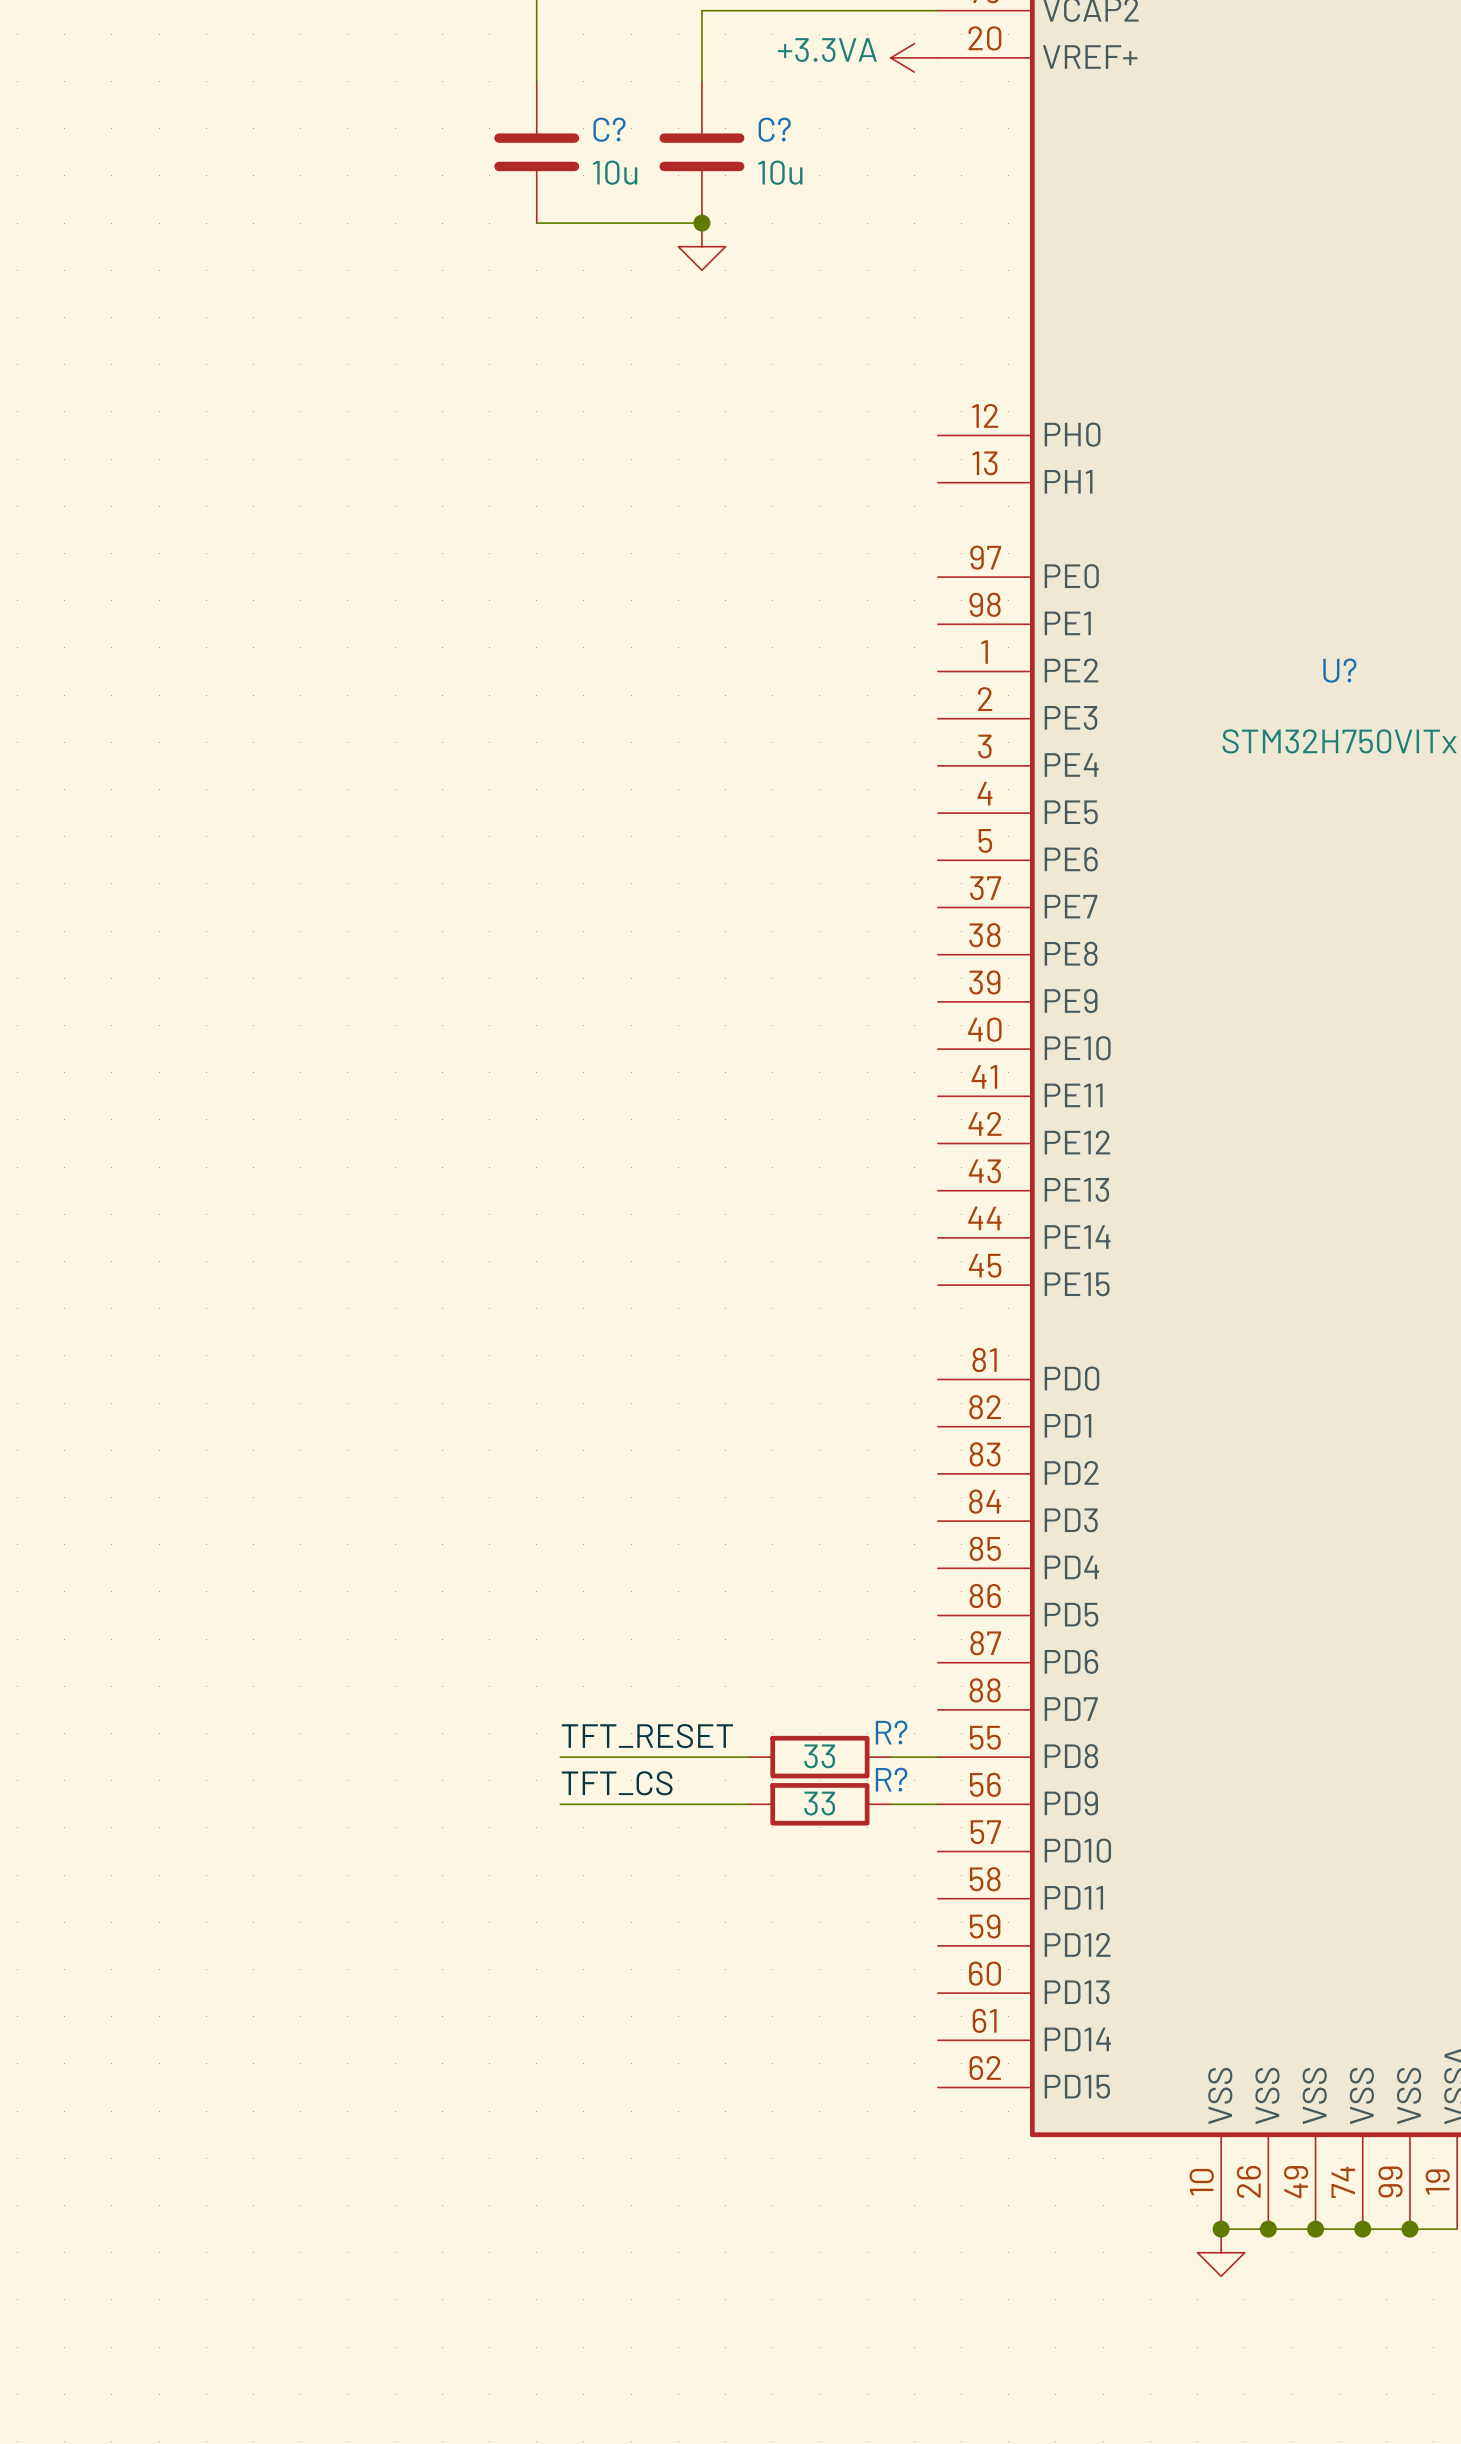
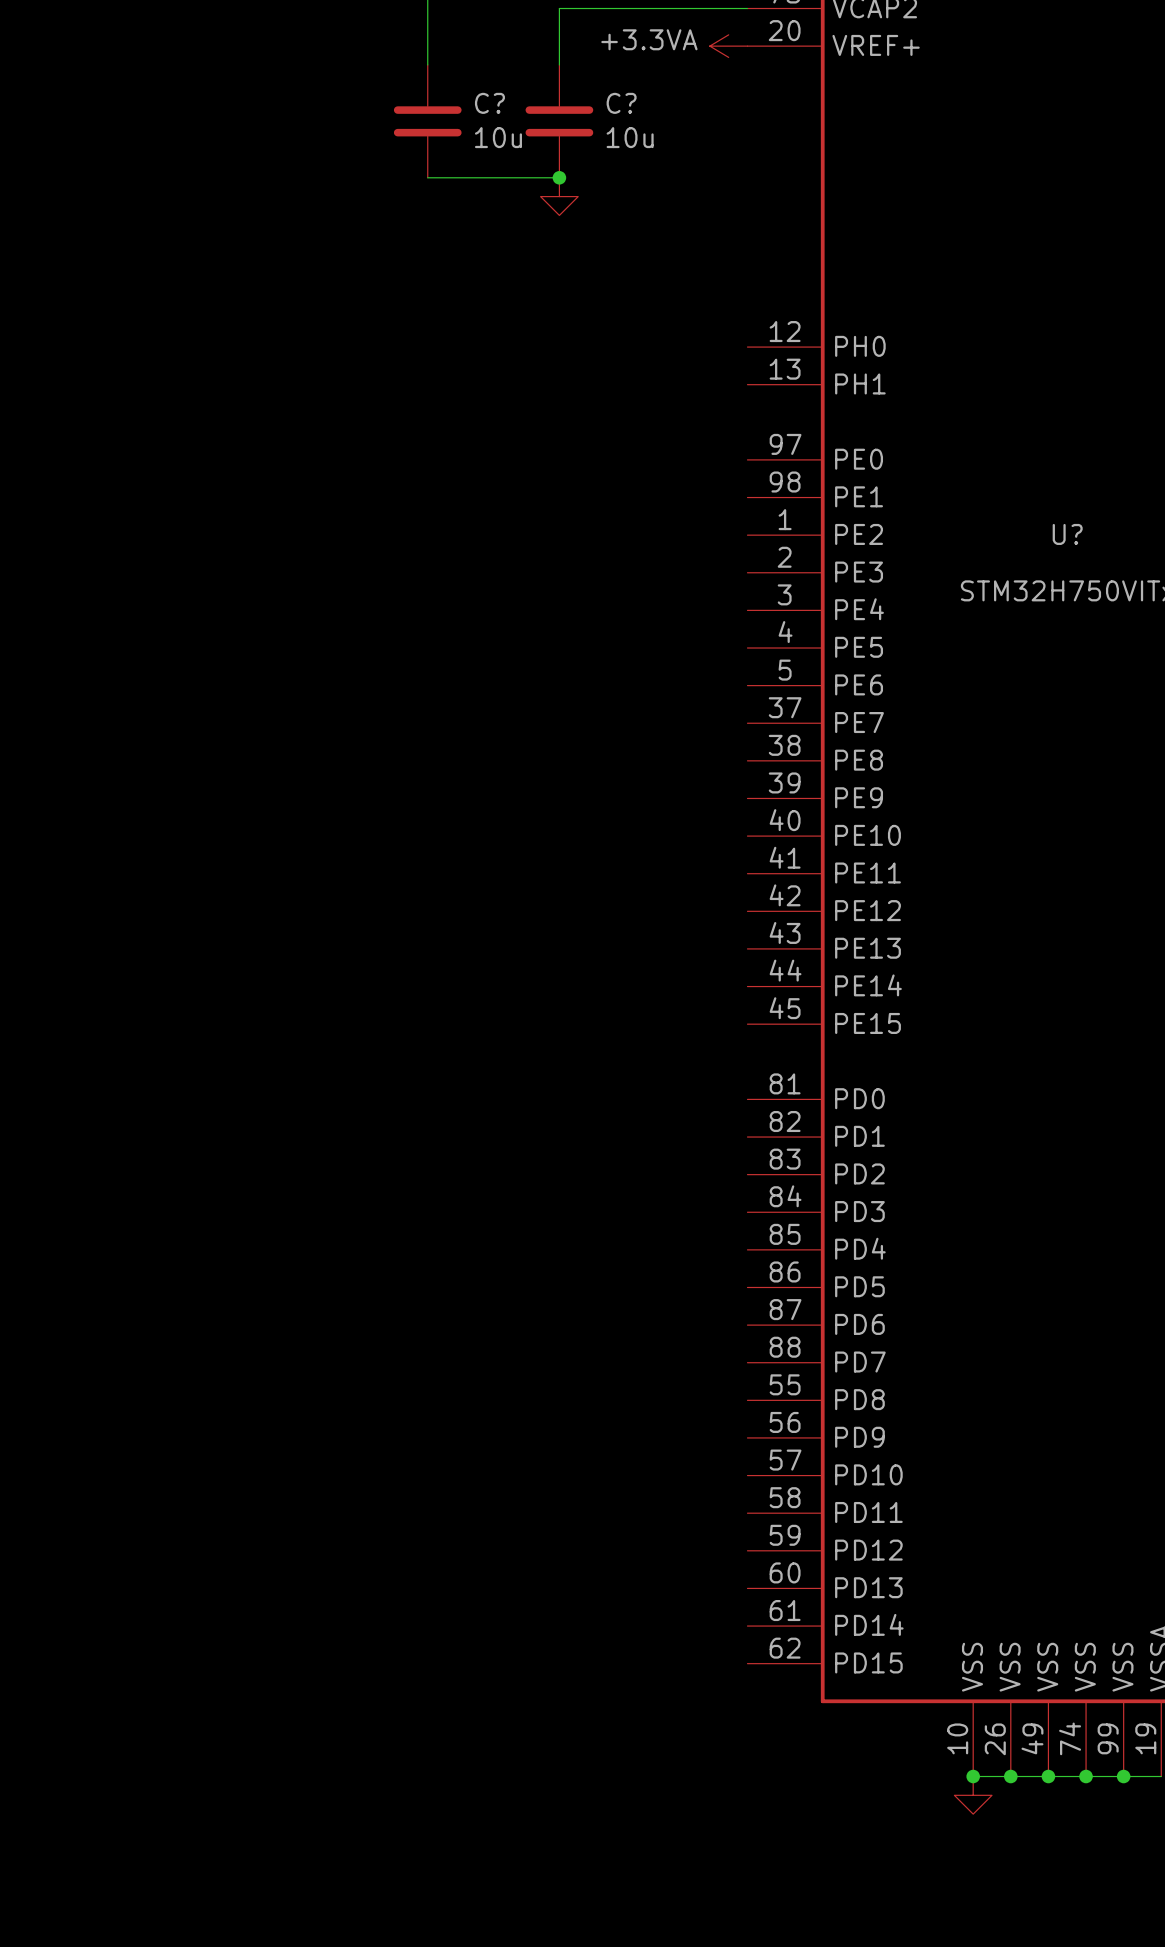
label: TFT_RESET (647, 1736) -> none
wire: (560, 1757) (749, 1757) -> none
R?: 33 (819, 1757) -> none
wire: (890, 1757) (937, 1757) -> none
label: TFT_CS (617, 1783) -> none
wire: (560, 1804) (749, 1804) -> none
R?: 33 (819, 1804) -> none
wire: (890, 1804) (937, 1804) -> none

